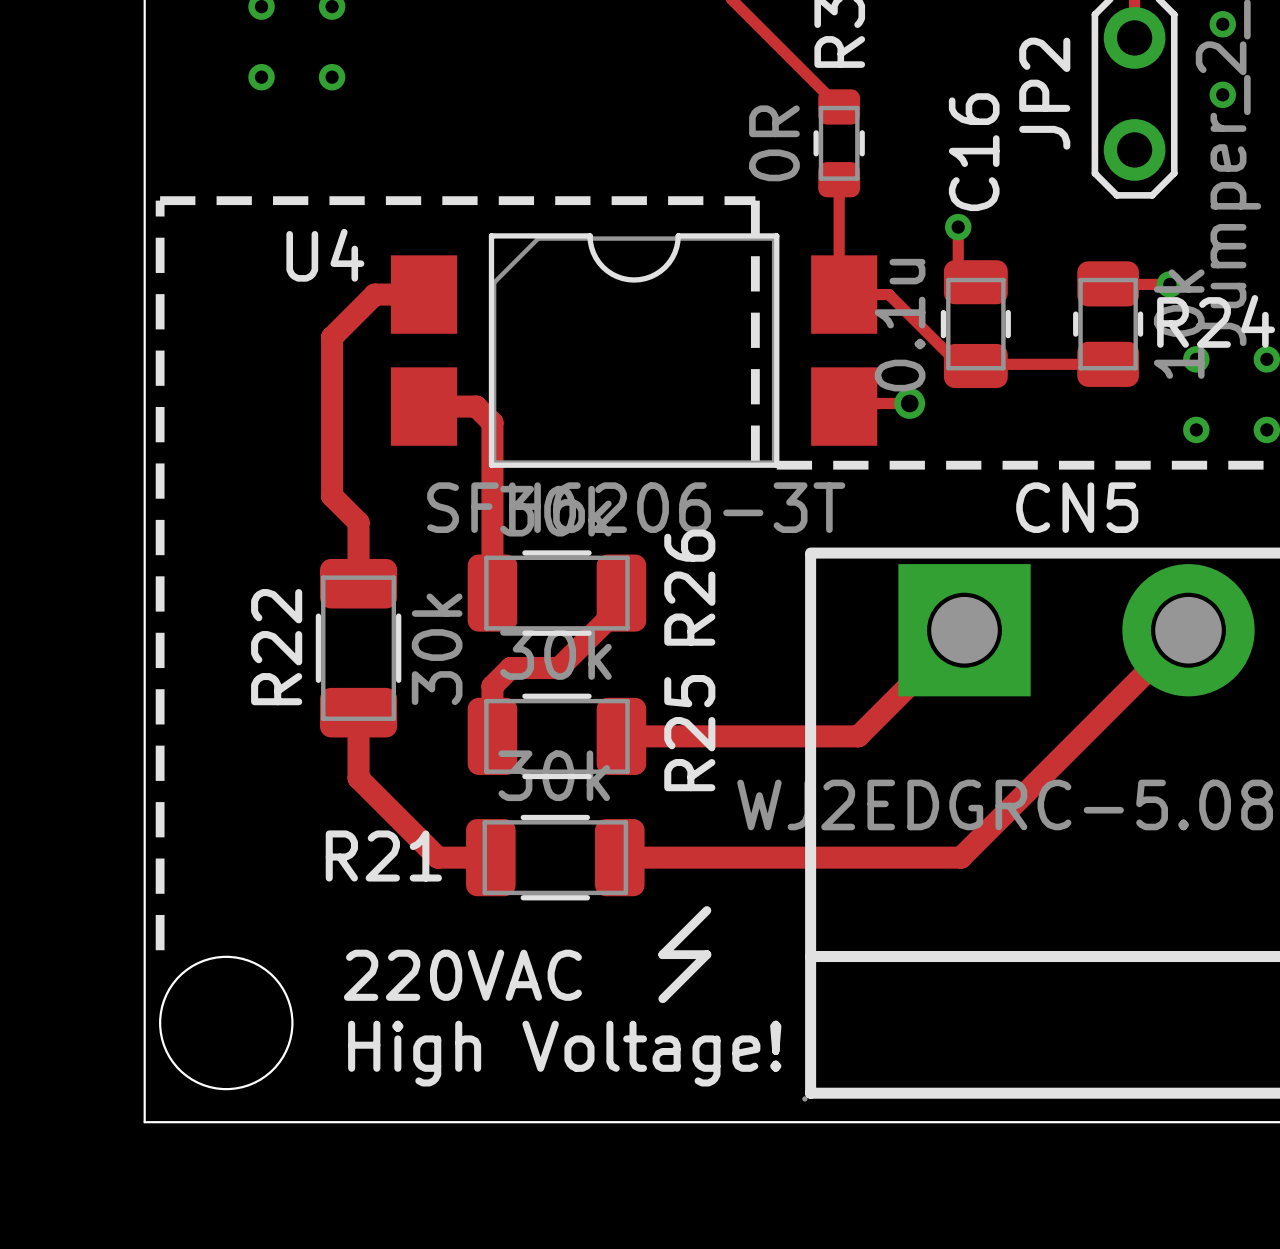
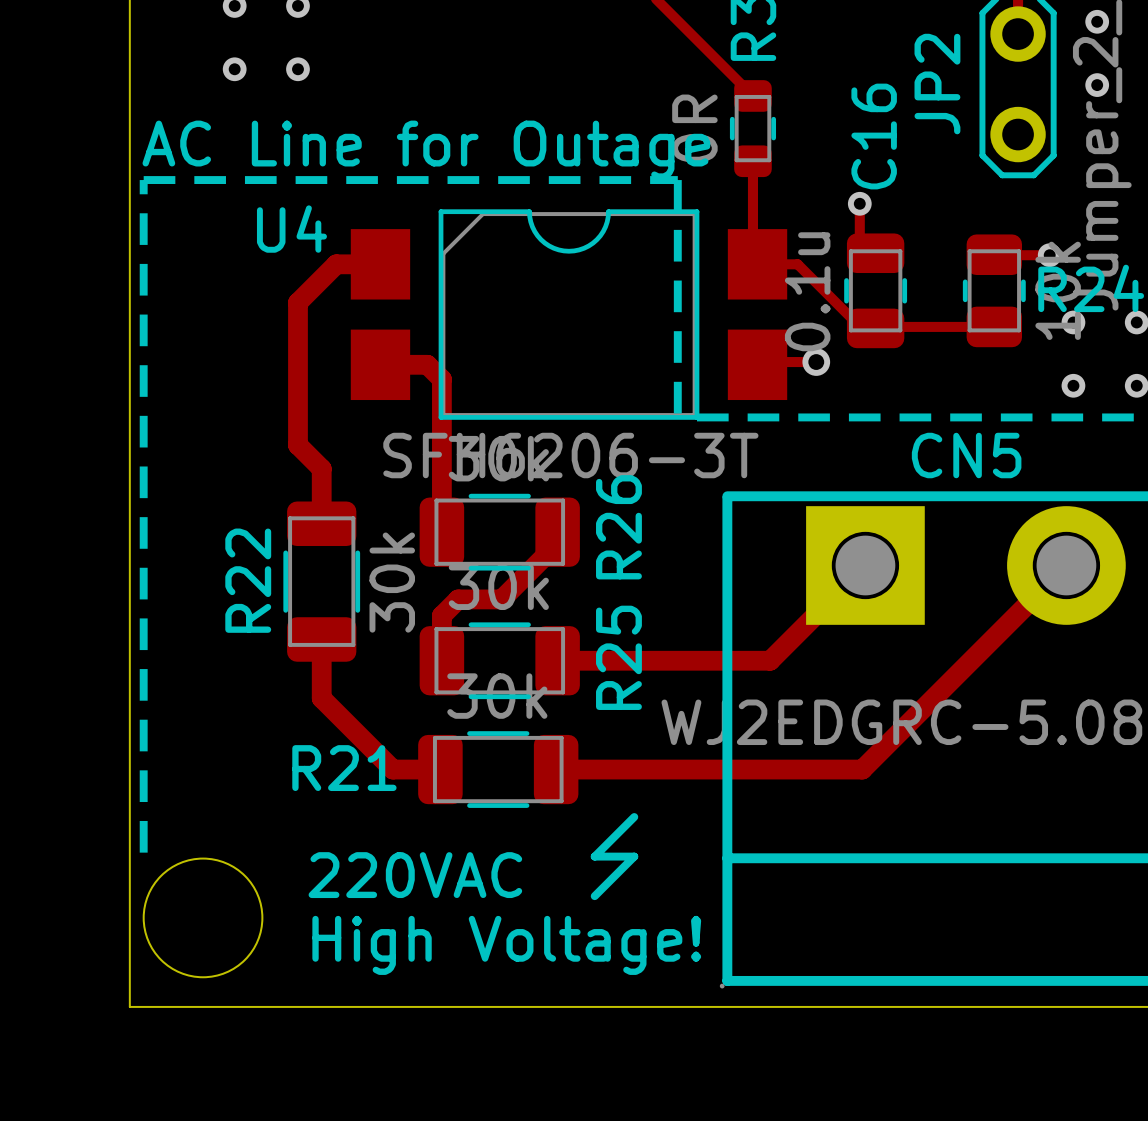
text: none -> AC Line for Outage (426, 150)

